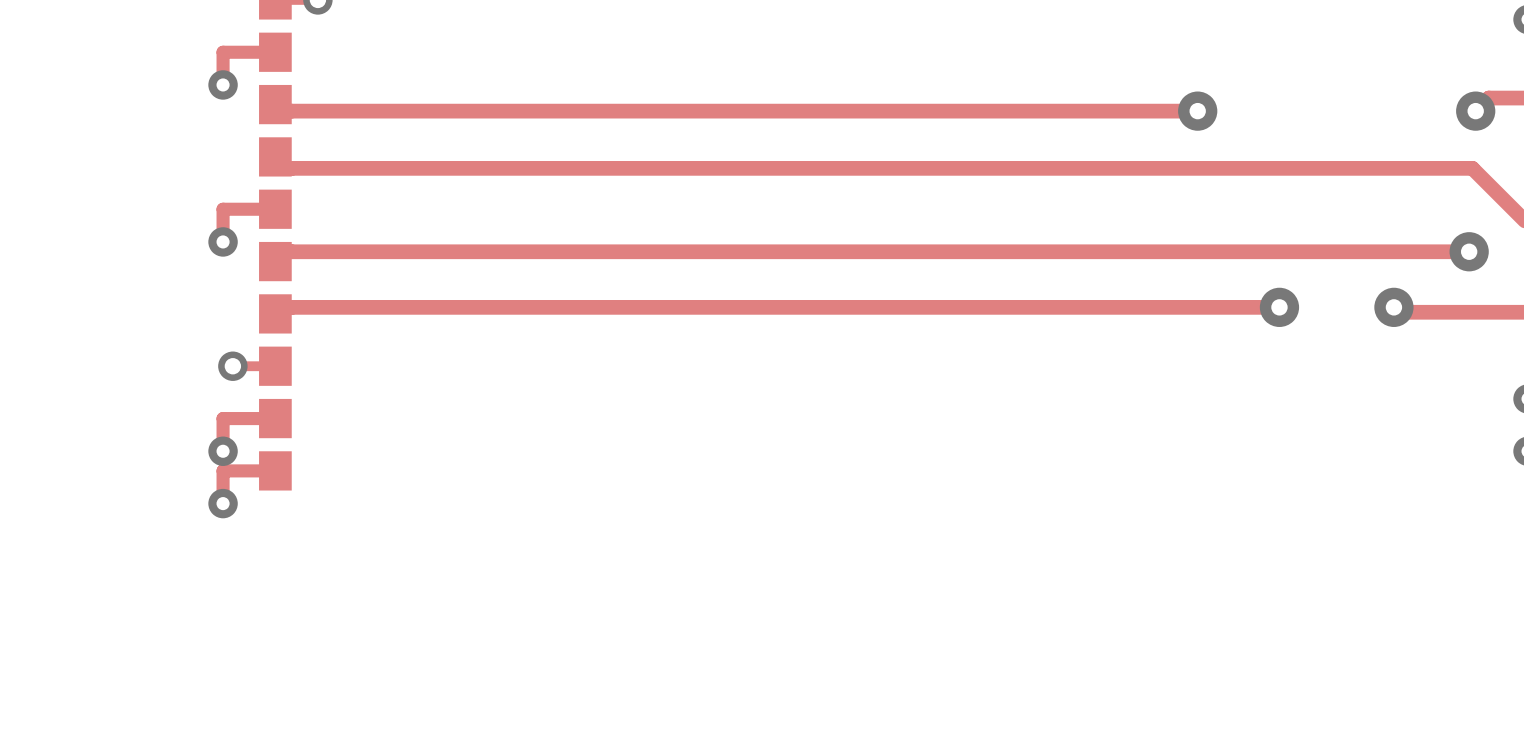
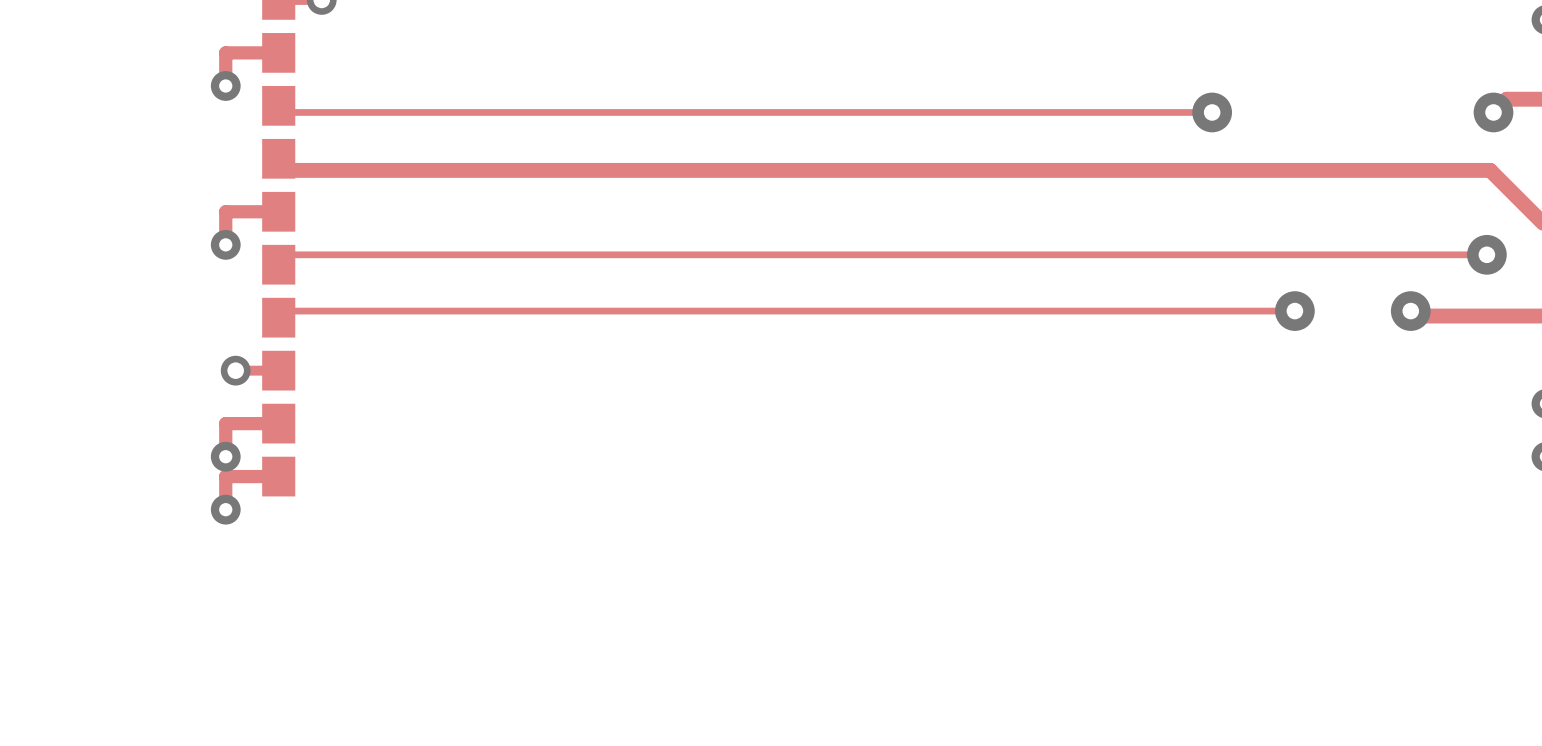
top track width: thick (275, 104) (281, 111) (1197, 111) -> thin (278, 105) (285, 112) (1212, 112)
top track width: thick (1469, 251) (285, 251) (275, 261) -> thin (1486, 254) (288, 254) (278, 264)
top track width: thick (1279, 307) (281, 307) (275, 313) -> thin (1294, 311) (285, 311) (278, 317)

